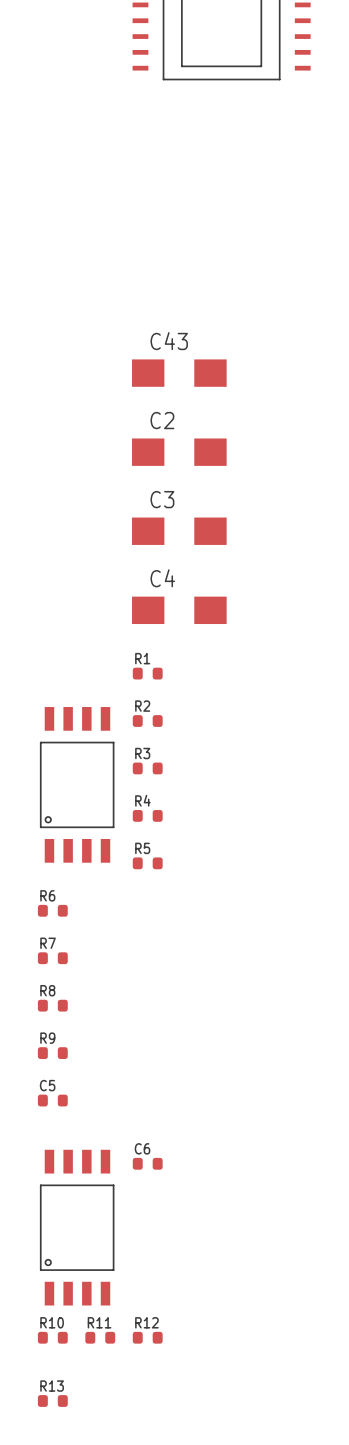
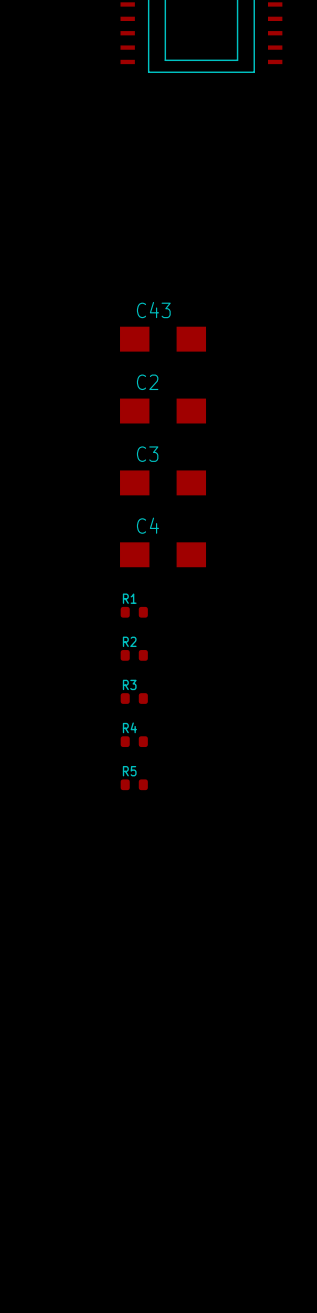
part: (77, 784) -> none
R6: (52, 910) -> none
R7: (52, 958) -> none
R8: (52, 1005) -> none
R9: (52, 1053) -> none
C5: (52, 1100) -> none
C6: (147, 1163) -> none
part: (77, 1227) -> none
R10: (52, 1337) -> none
R11: (100, 1337) -> none
R12: (147, 1337) -> none
R13: (52, 1401) -> none

